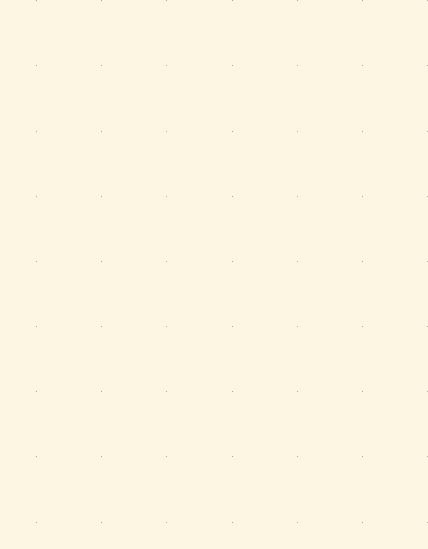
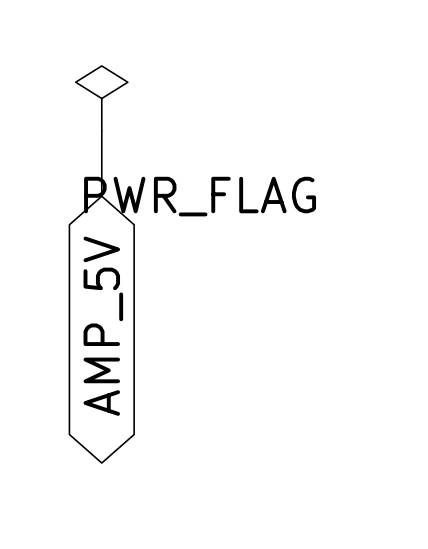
power symbol: none -> PWR_FLAG (101, 98)
wire: none -> (101, 131) (101, 196)
global label: none -> AMP_5V (103, 326)

